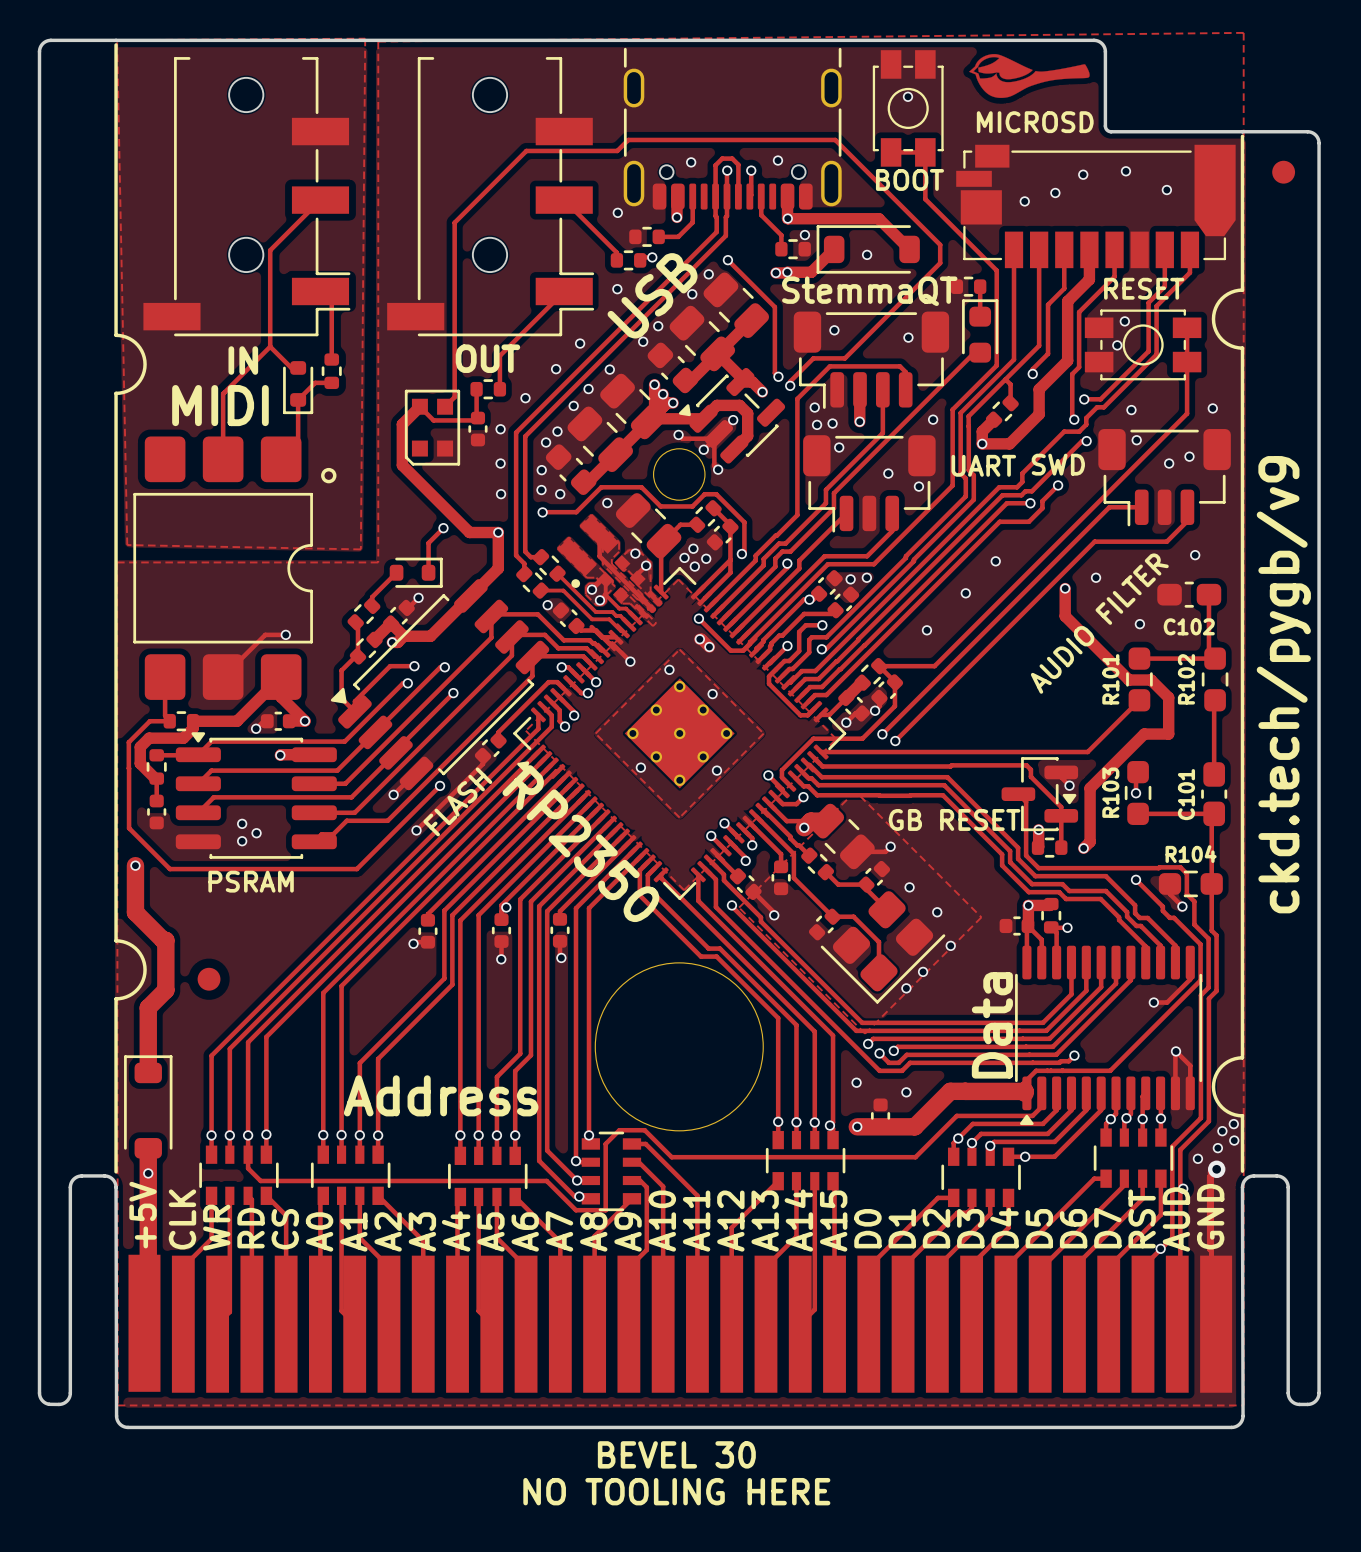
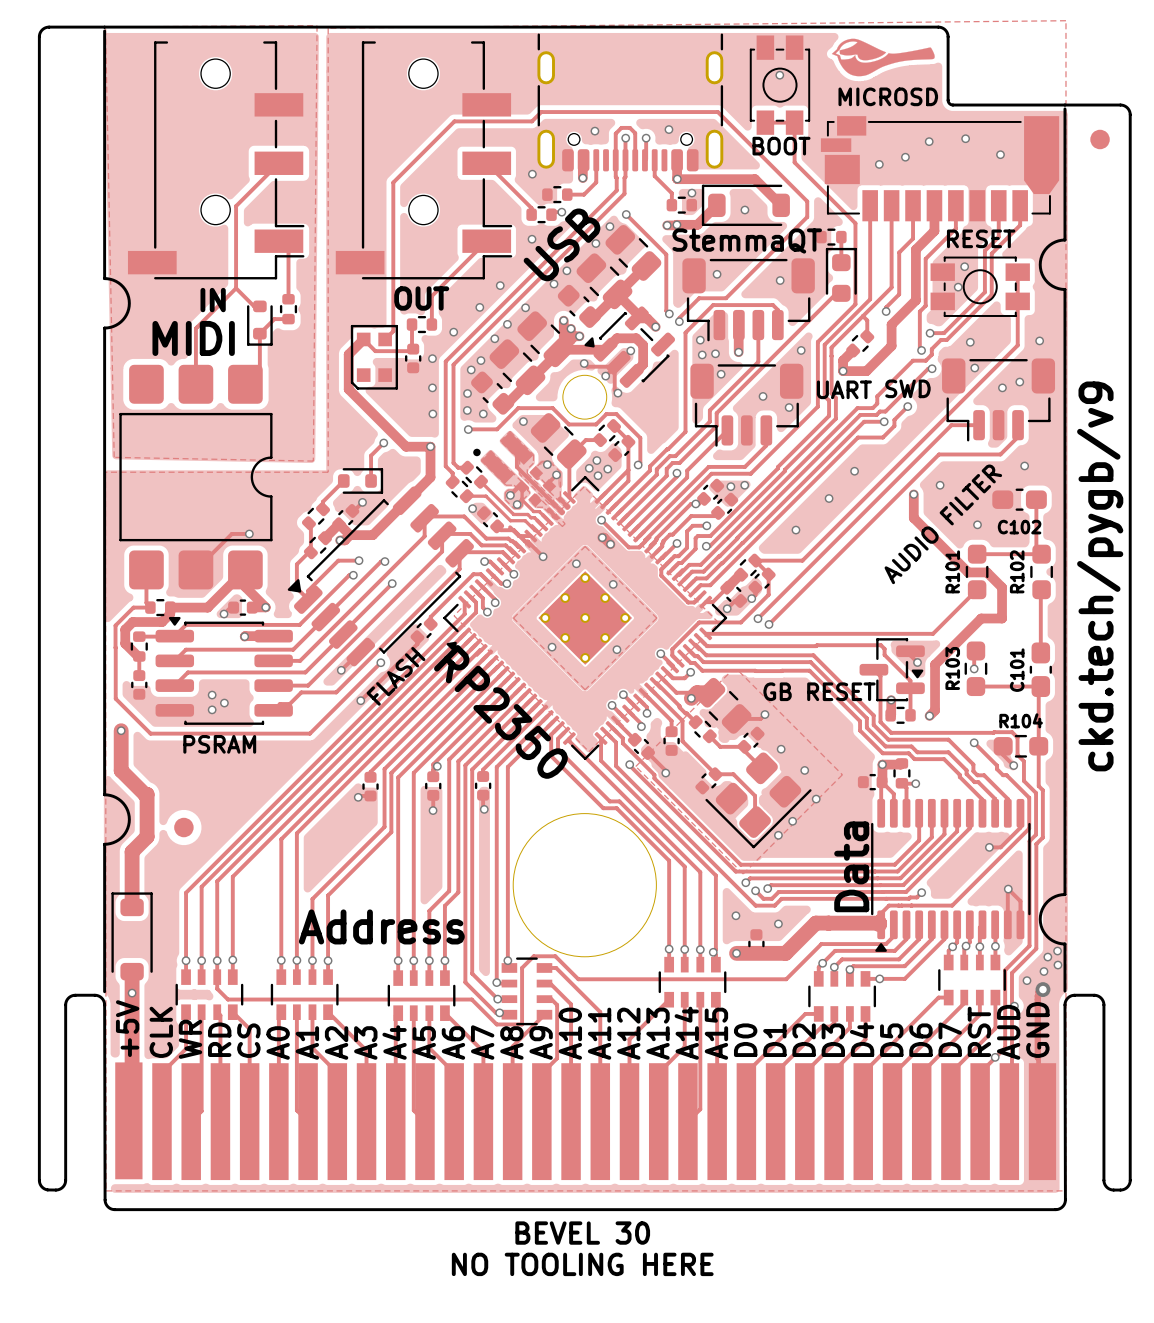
drawing: [321, 467, 337, 484] -> none
part footprint: [557, 515, 620, 588] -> [473, 431, 534, 485]

